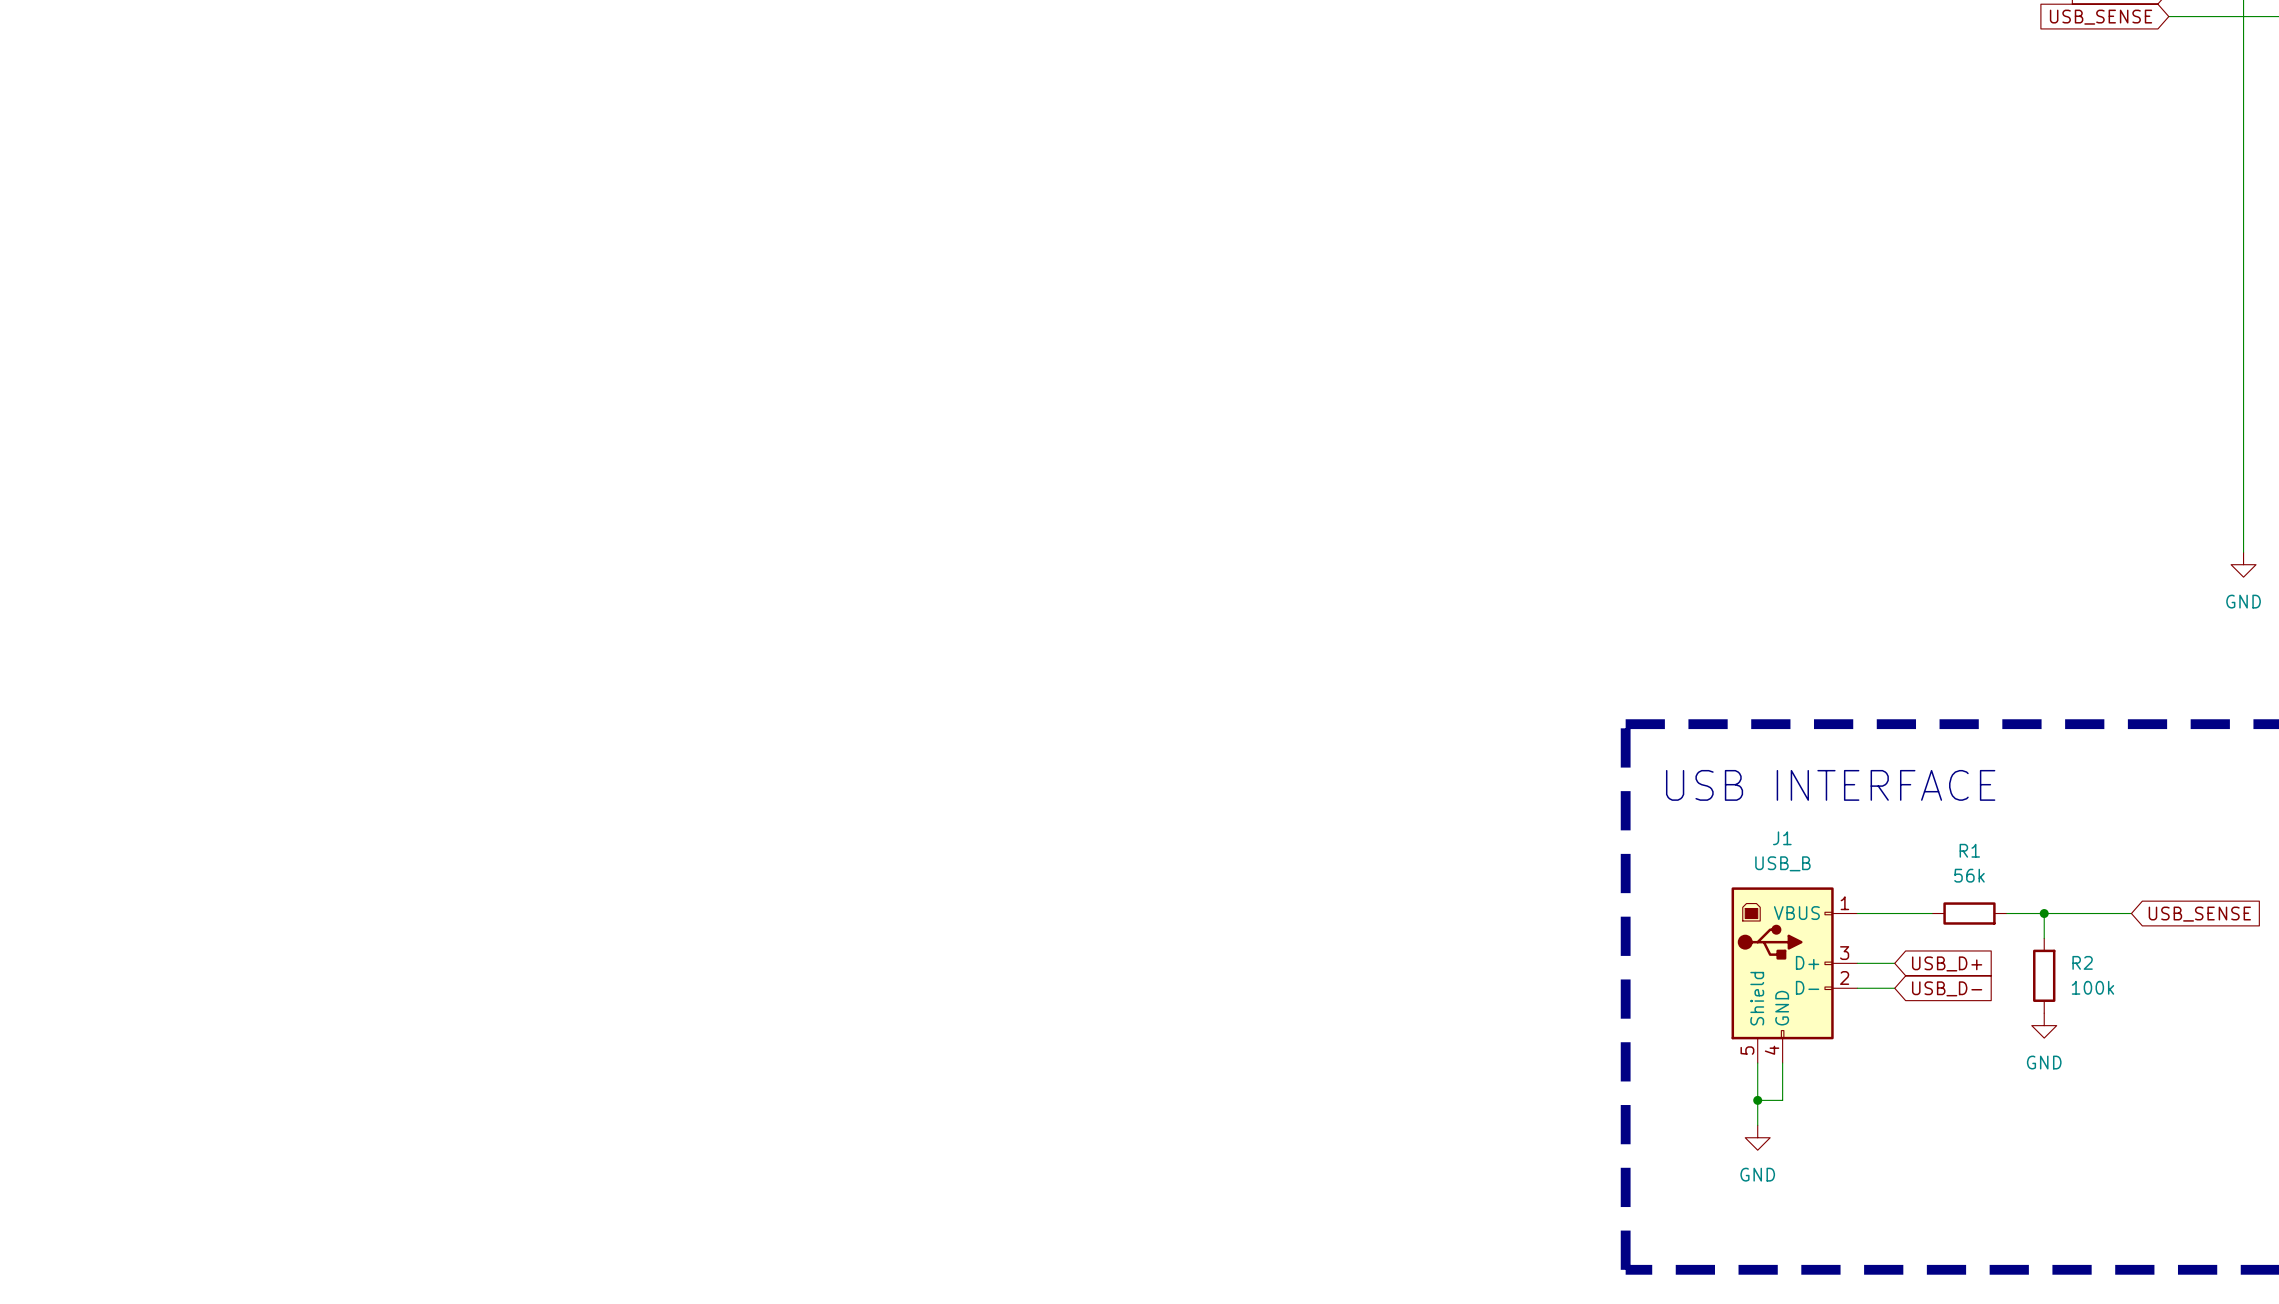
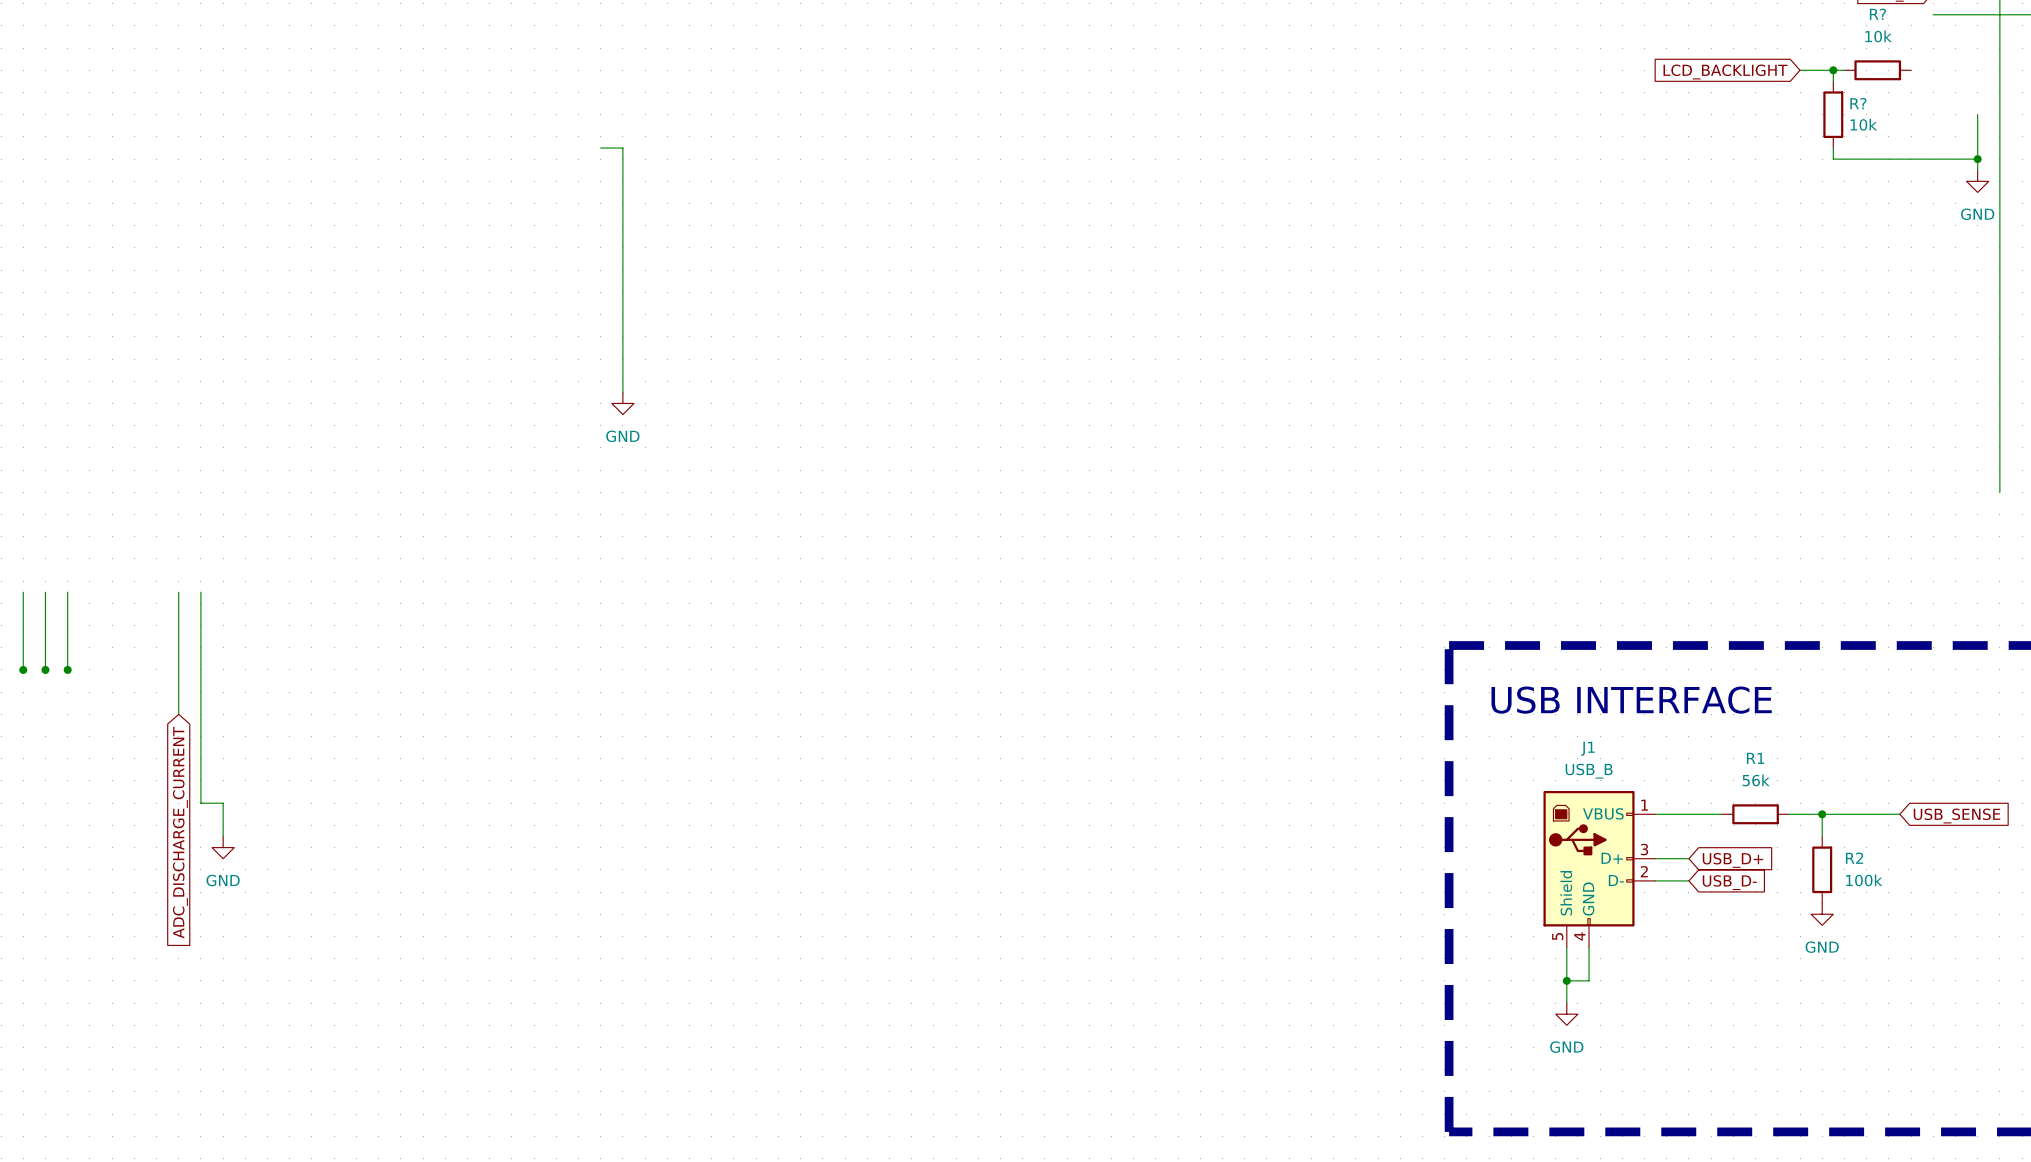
global label: USB_SENSE (2101, 17) -> none
wire: none -> (1800, 70) (1844, 70)
wire: none -> (1833, 70) (1833, 81)
junction: none -> (1833, 70)
R?: none -> 10k (1877, 70)
global label: none -> LCD_BACKLIGHT (1725, 71)
R?: none -> 10k (1833, 114)
wire: none -> (1977, 114) (1977, 170)
wire: none -> (600, 148) (622, 148) (622, 392)
wire: none -> (1833, 148) (1833, 159) (1977, 159)
junction: none -> (1977, 159)
power symbol: none -> GND (1977, 181)
power symbol: none -> GND (622, 403)
power symbol: GND (2243, 564) -> none
wire: none -> (23, 592) (23, 669)
wire: none -> (45, 592) (45, 669)
wire: none -> (67, 592) (67, 669)
wire: none -> (178, 592) (178, 714)
wire: none -> (200, 592) (200, 803) (223, 803) (223, 836)
junction: none -> (23, 669)
junction: none -> (45, 669)
junction: none -> (67, 669)
global label: none -> ADC_DISCHARGE_CURRENT (180, 832)
power symbol: none -> GND (223, 847)

